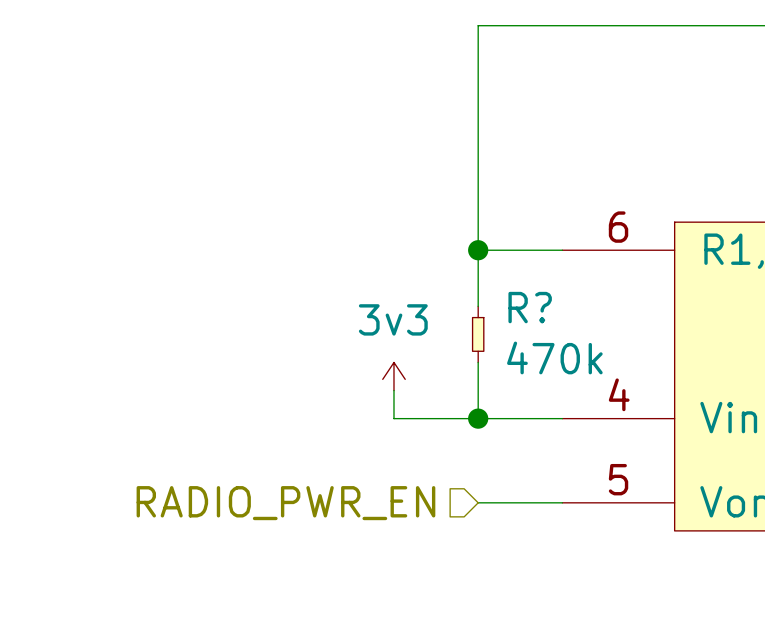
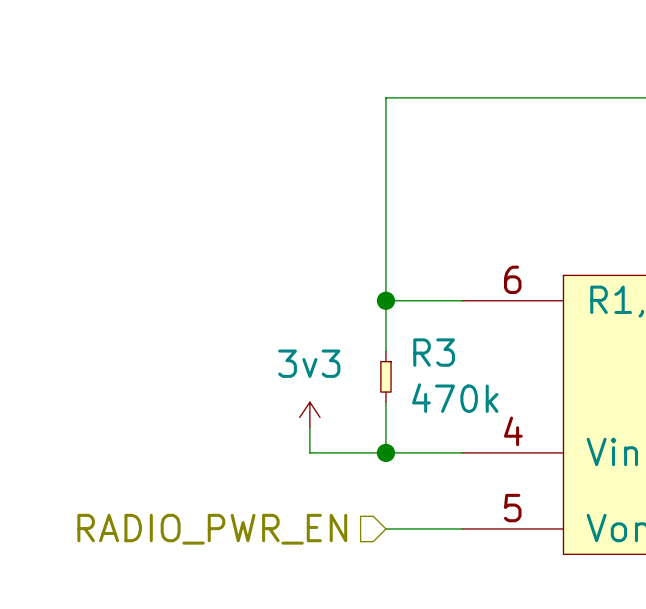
R? name: R? (530, 307) -> R3 (434, 352)

